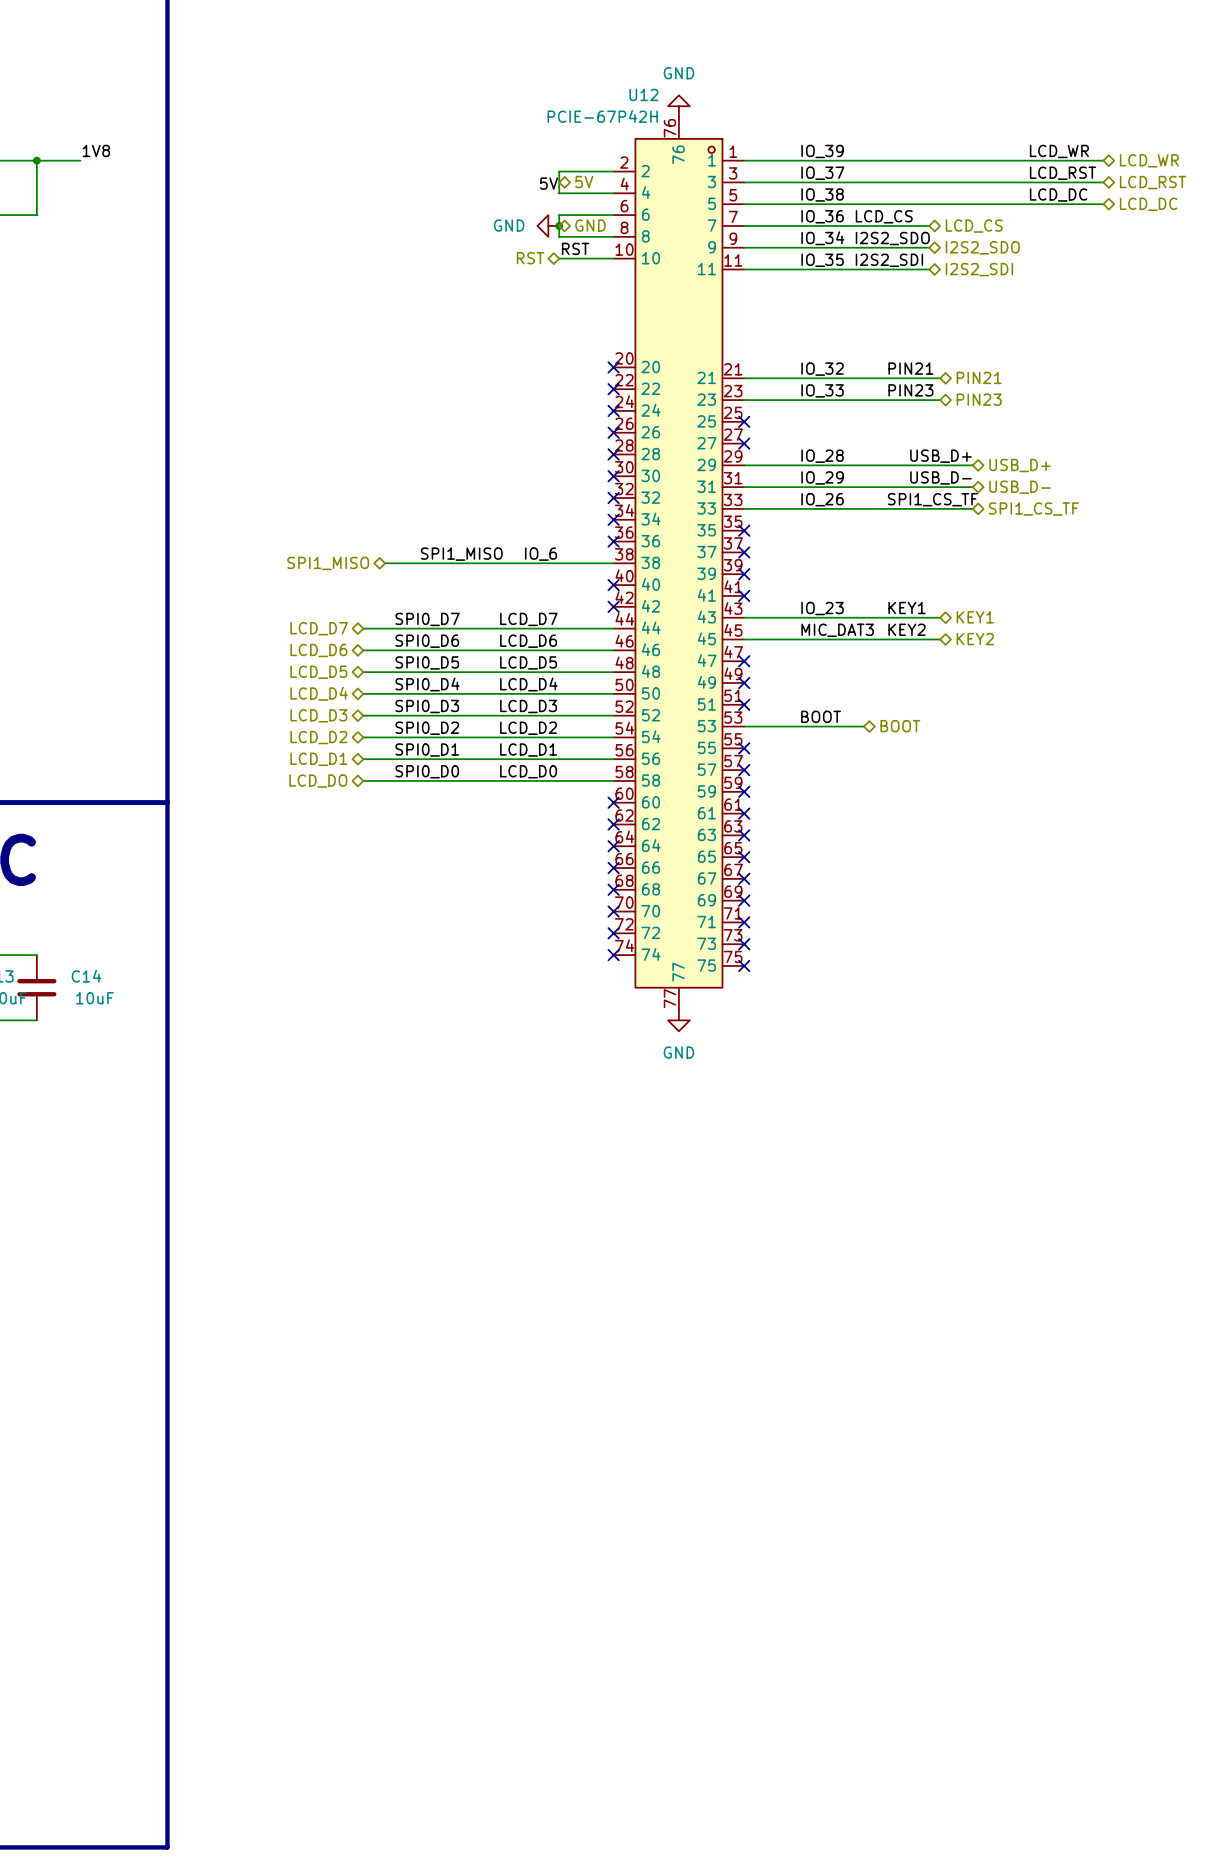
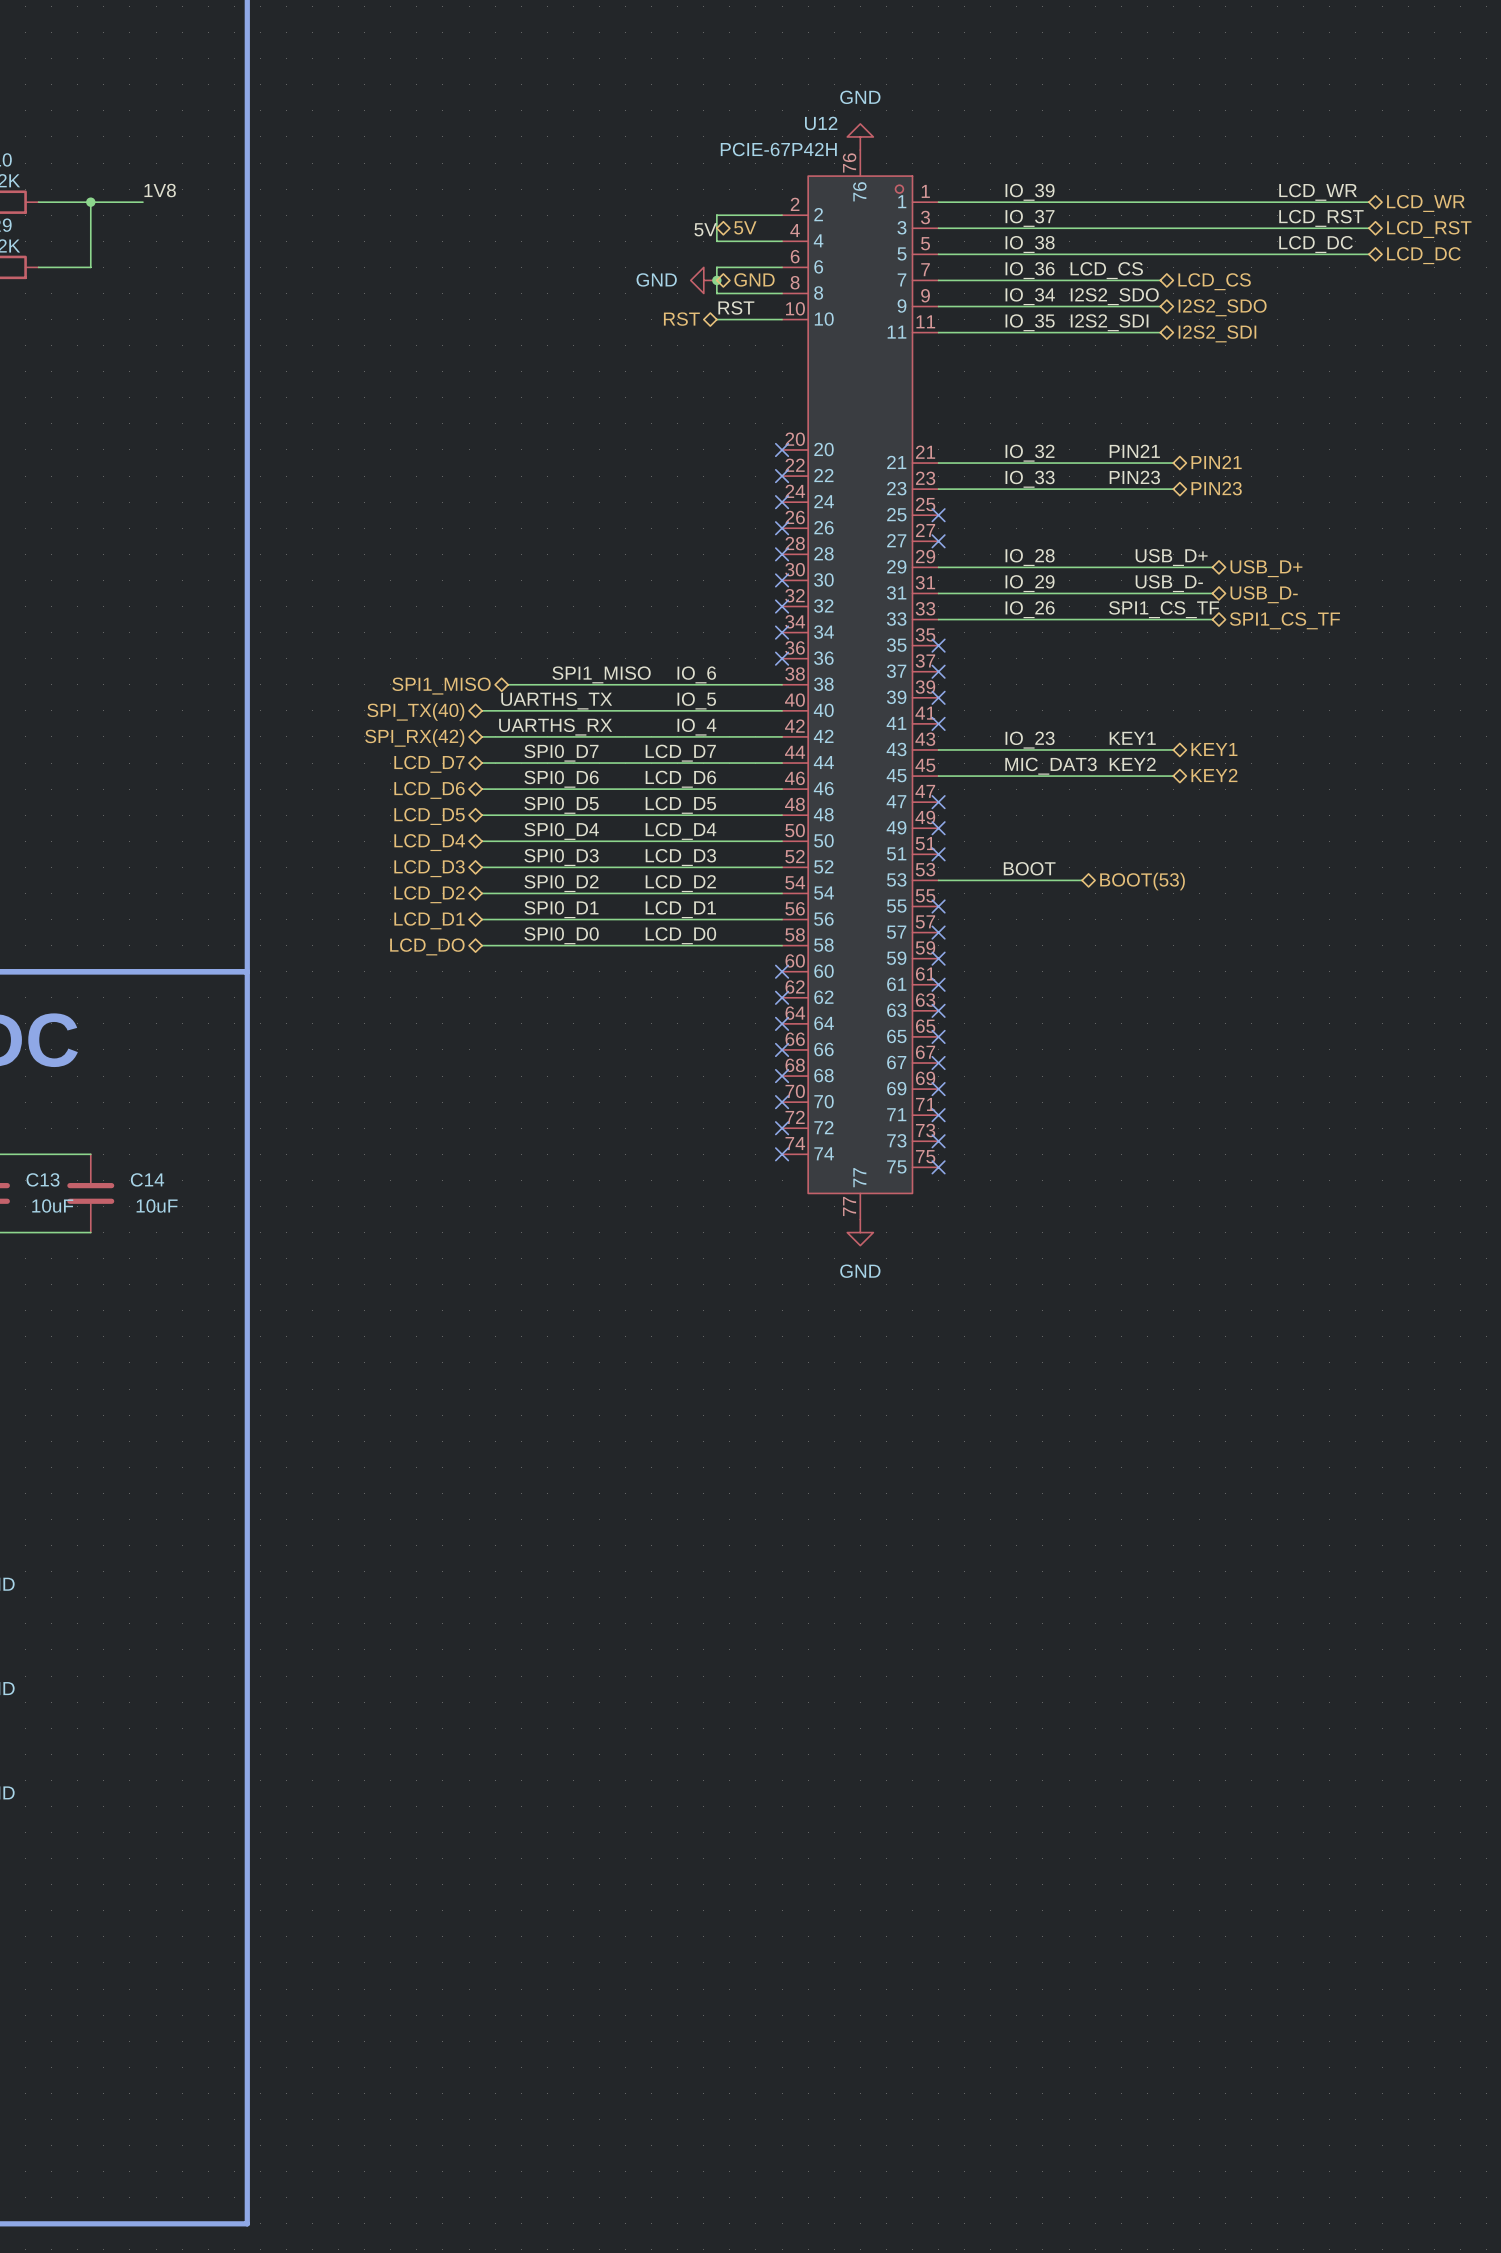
label: none -> UARTHS_TX (556, 701)
label: none -> IO_5 (696, 701)
hierarchical label: none -> SPI_TX(40) (415, 711)
wire: none -> (482, 710) (782, 710)
no-connect mark: (613, 585) -> none
label: none -> UARTHS_RX (555, 727)
label: none -> IO_4 (696, 727)
wire: none -> (482, 736) (782, 736)
no-connect mark: (613, 606) -> none
hierarchical label: none -> SPI_RX(42) (414, 738)
hierarchical label: BOOT (900, 726) -> BOOT(53) (1142, 881)

